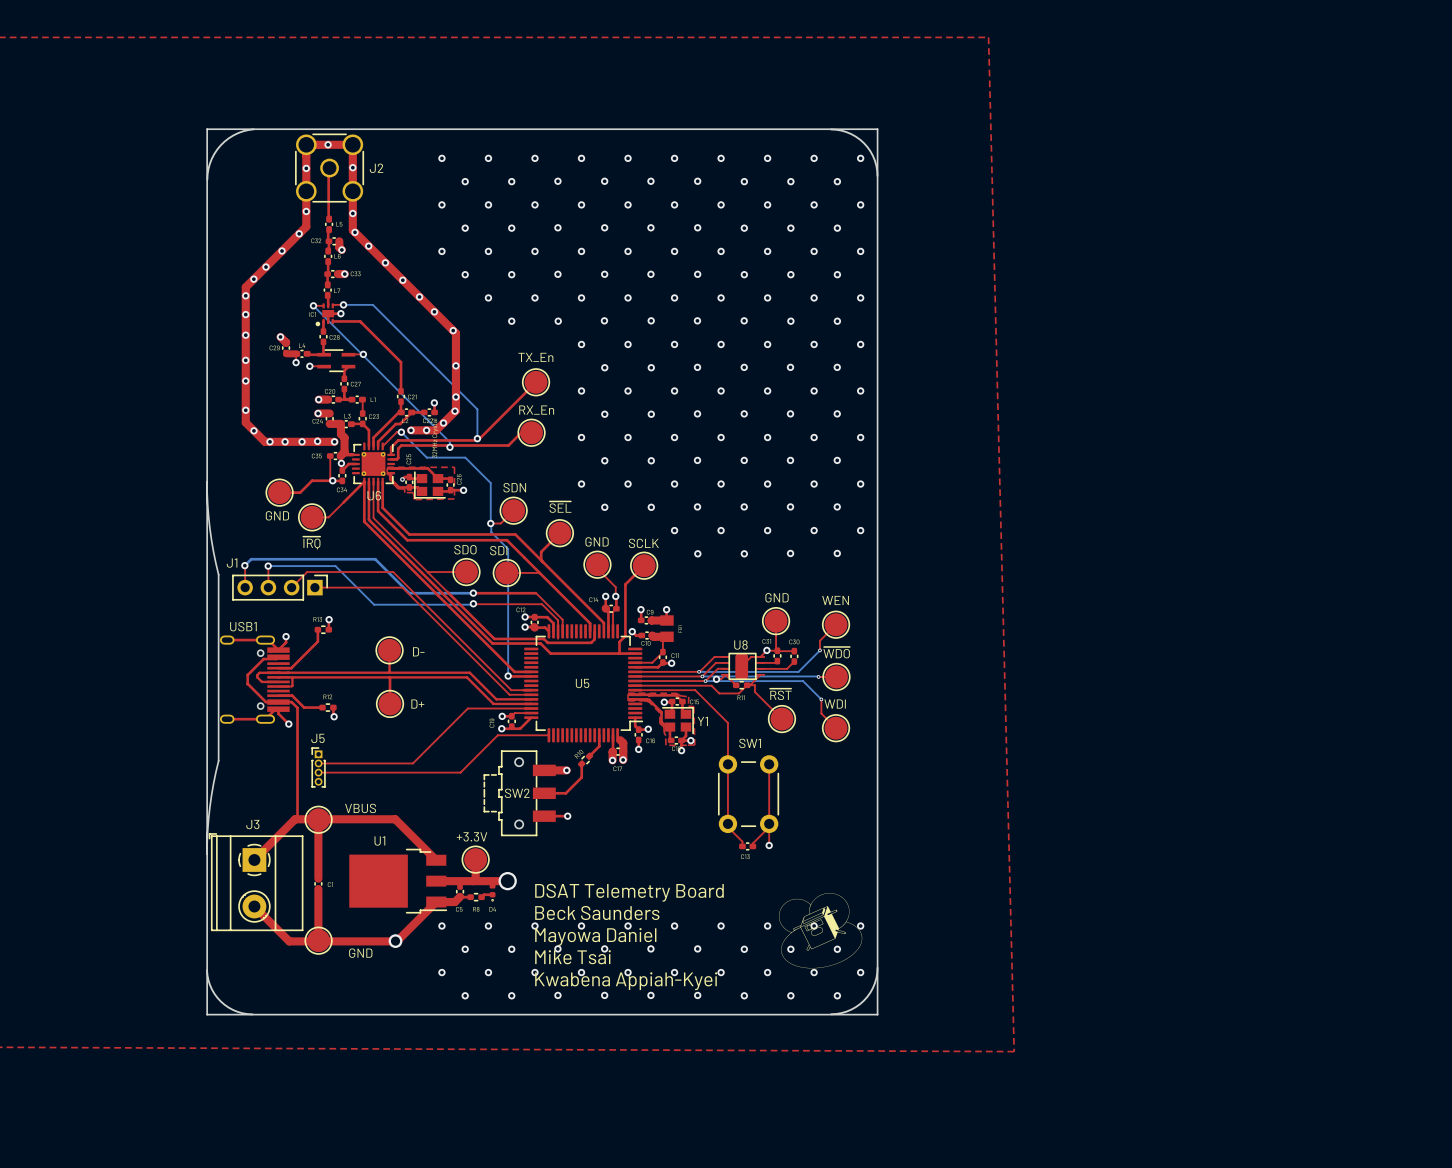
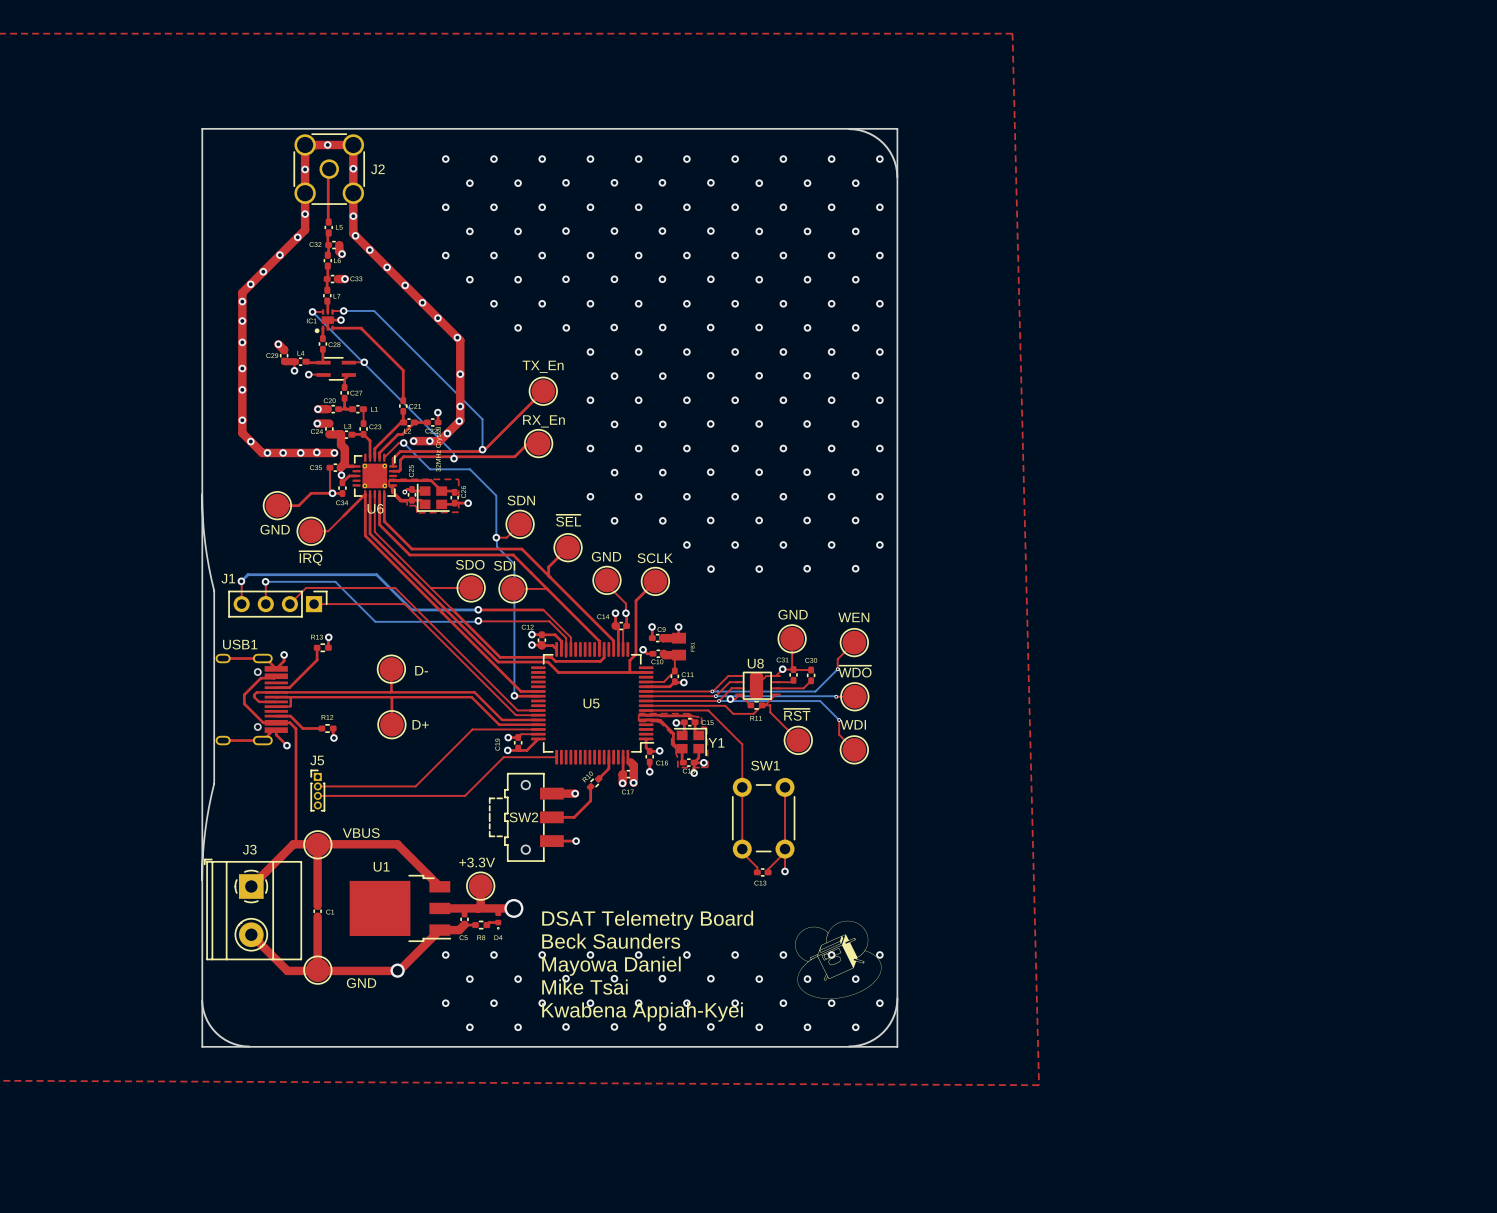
board edge: (253, 129) (238, 133) (220, 145) (211, 158) (207, 179) -> none

